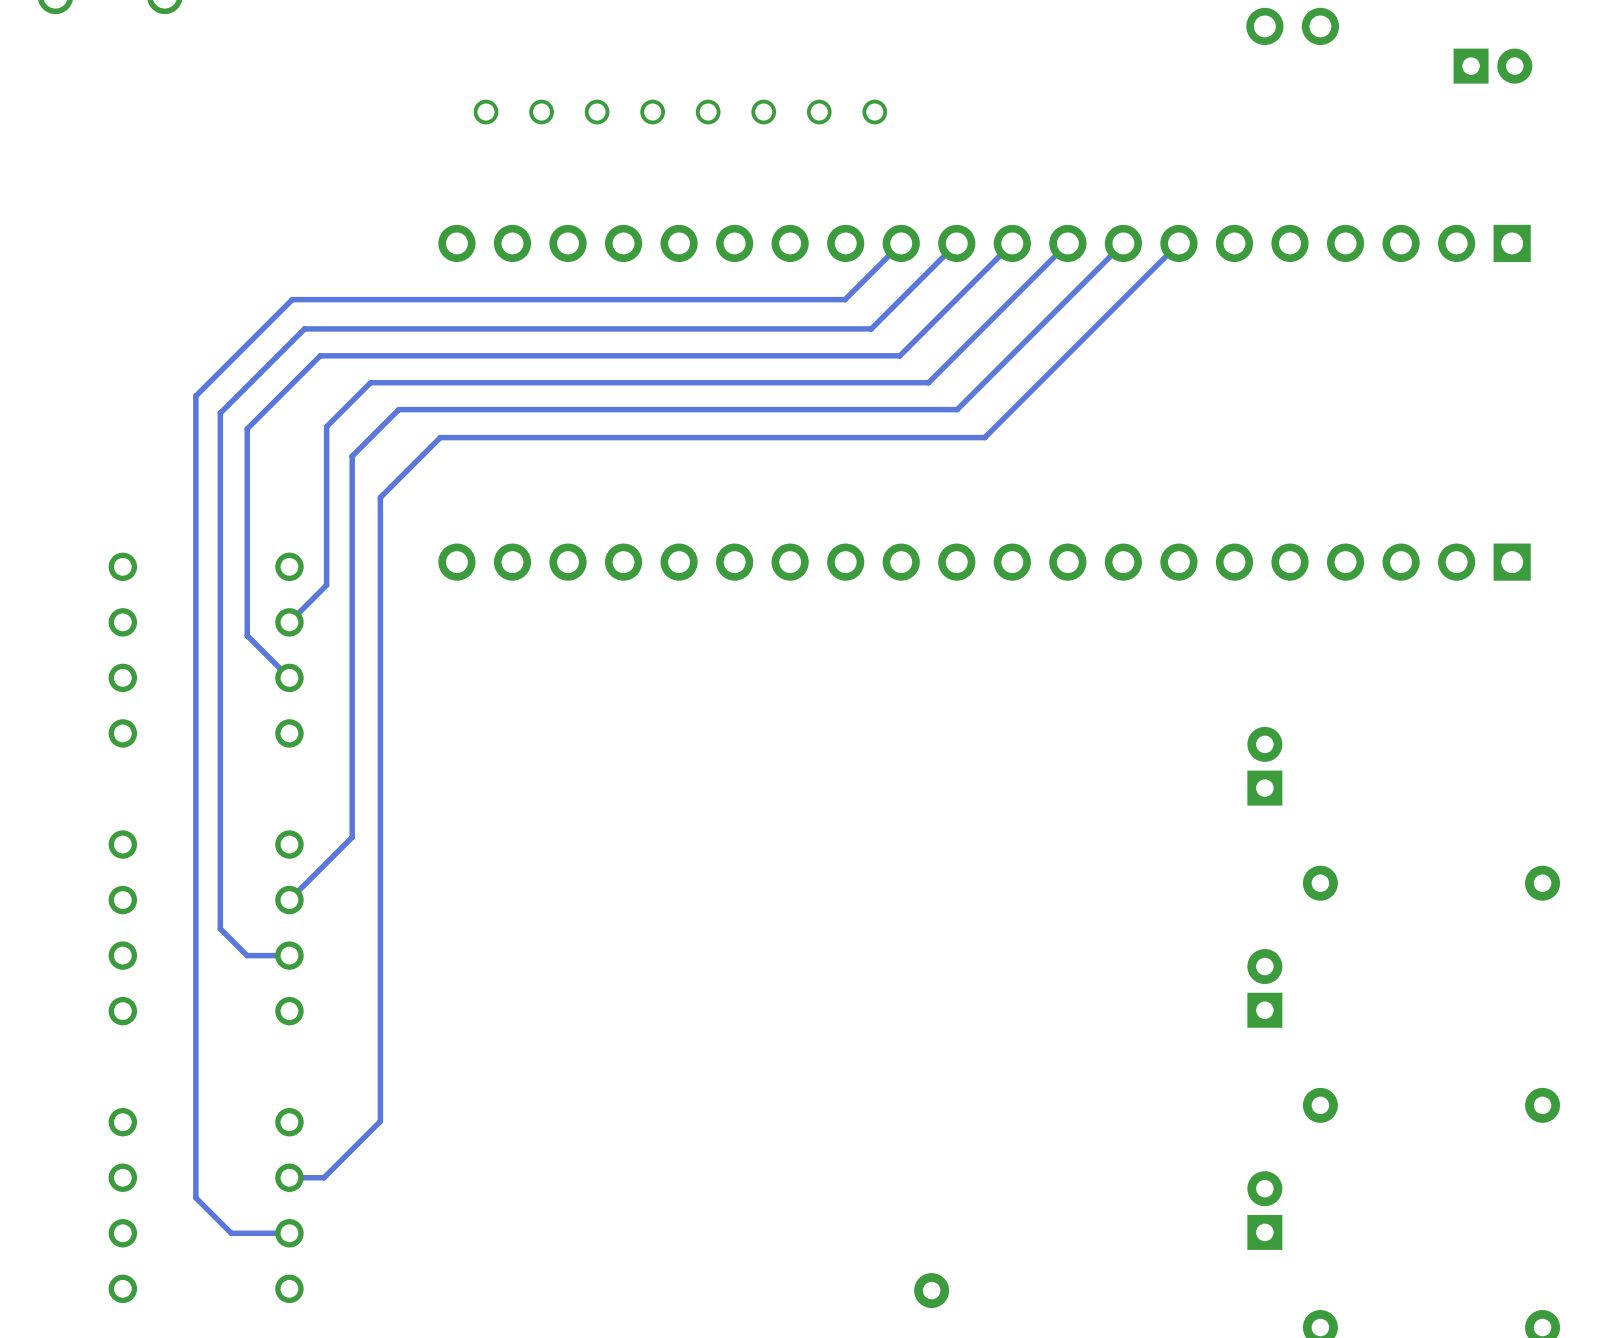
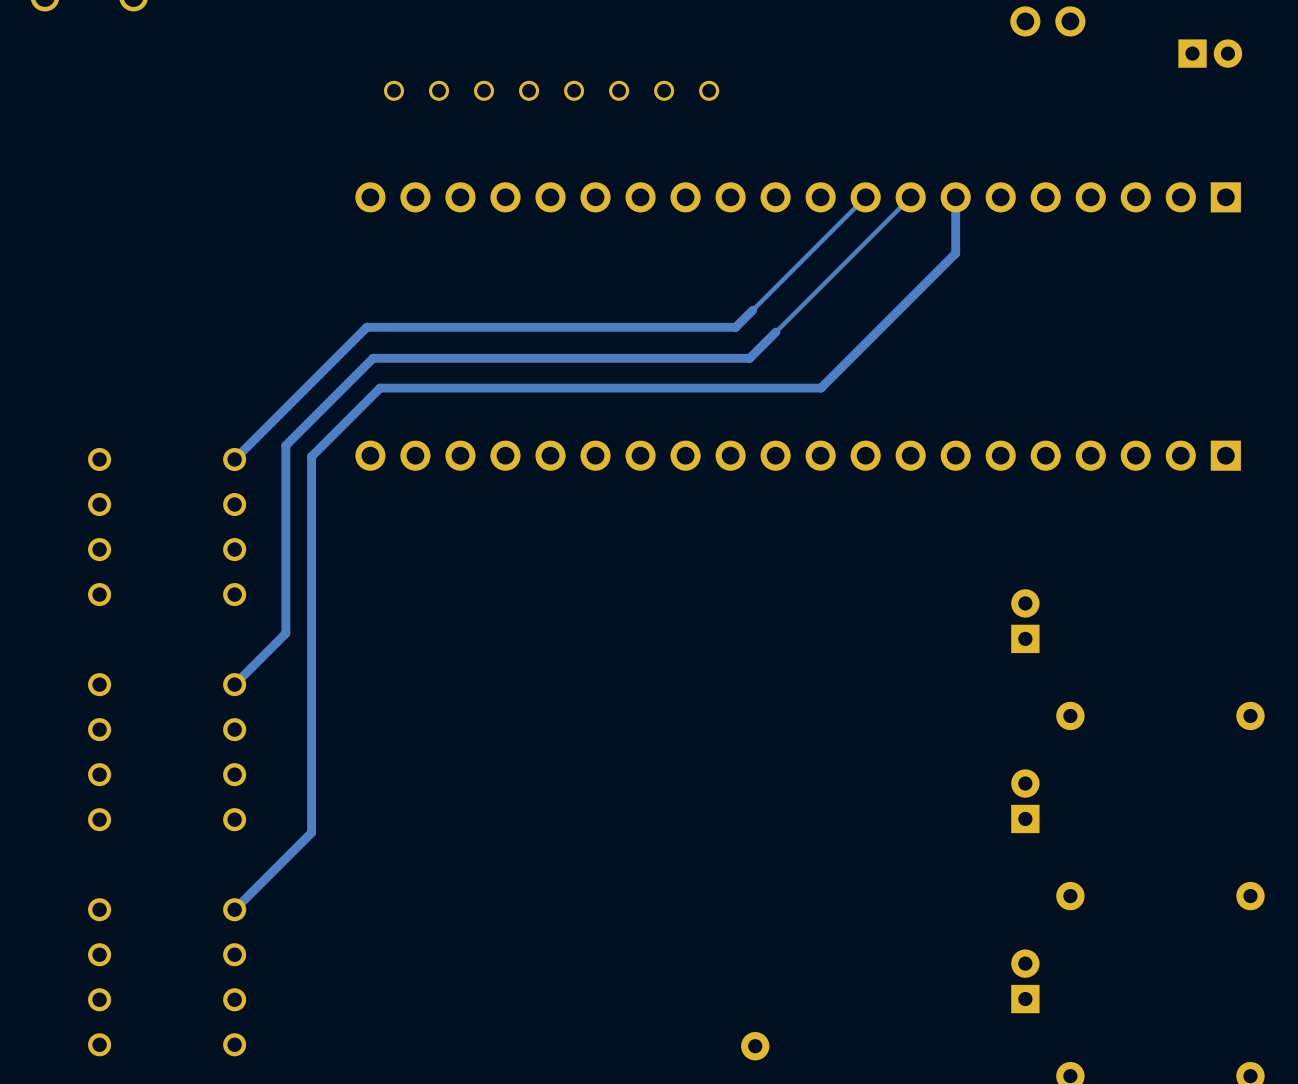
track: (901, 243) (845, 299) (292, 299) (195, 396) (195, 1197) (231, 1233) (289, 1233) -> none
track: (956, 243) (871, 328) (304, 328) (220, 413) (220, 928) (247, 955) (289, 955) -> none
track: (1012, 243) (899, 355) (320, 355) (247, 428) (247, 635) (289, 677) -> none
track: (1178, 243) (984, 437) (440, 437) (380, 497) (380, 1121) (323, 1177) (289, 1177) -> (955, 197) (955, 253) (820, 388) (380, 388) (311, 456) (311, 832) (234, 909)
track: (928, 382) (370, 382) (326, 426) (326, 585) (289, 622) -> (752, 310) (735, 327) (366, 327) (234, 459)
track: (957, 409) (398, 409) (352, 456) (352, 837) (289, 900) -> (775, 332) (749, 358) (373, 358) (285, 445) (285, 633) (234, 684)

